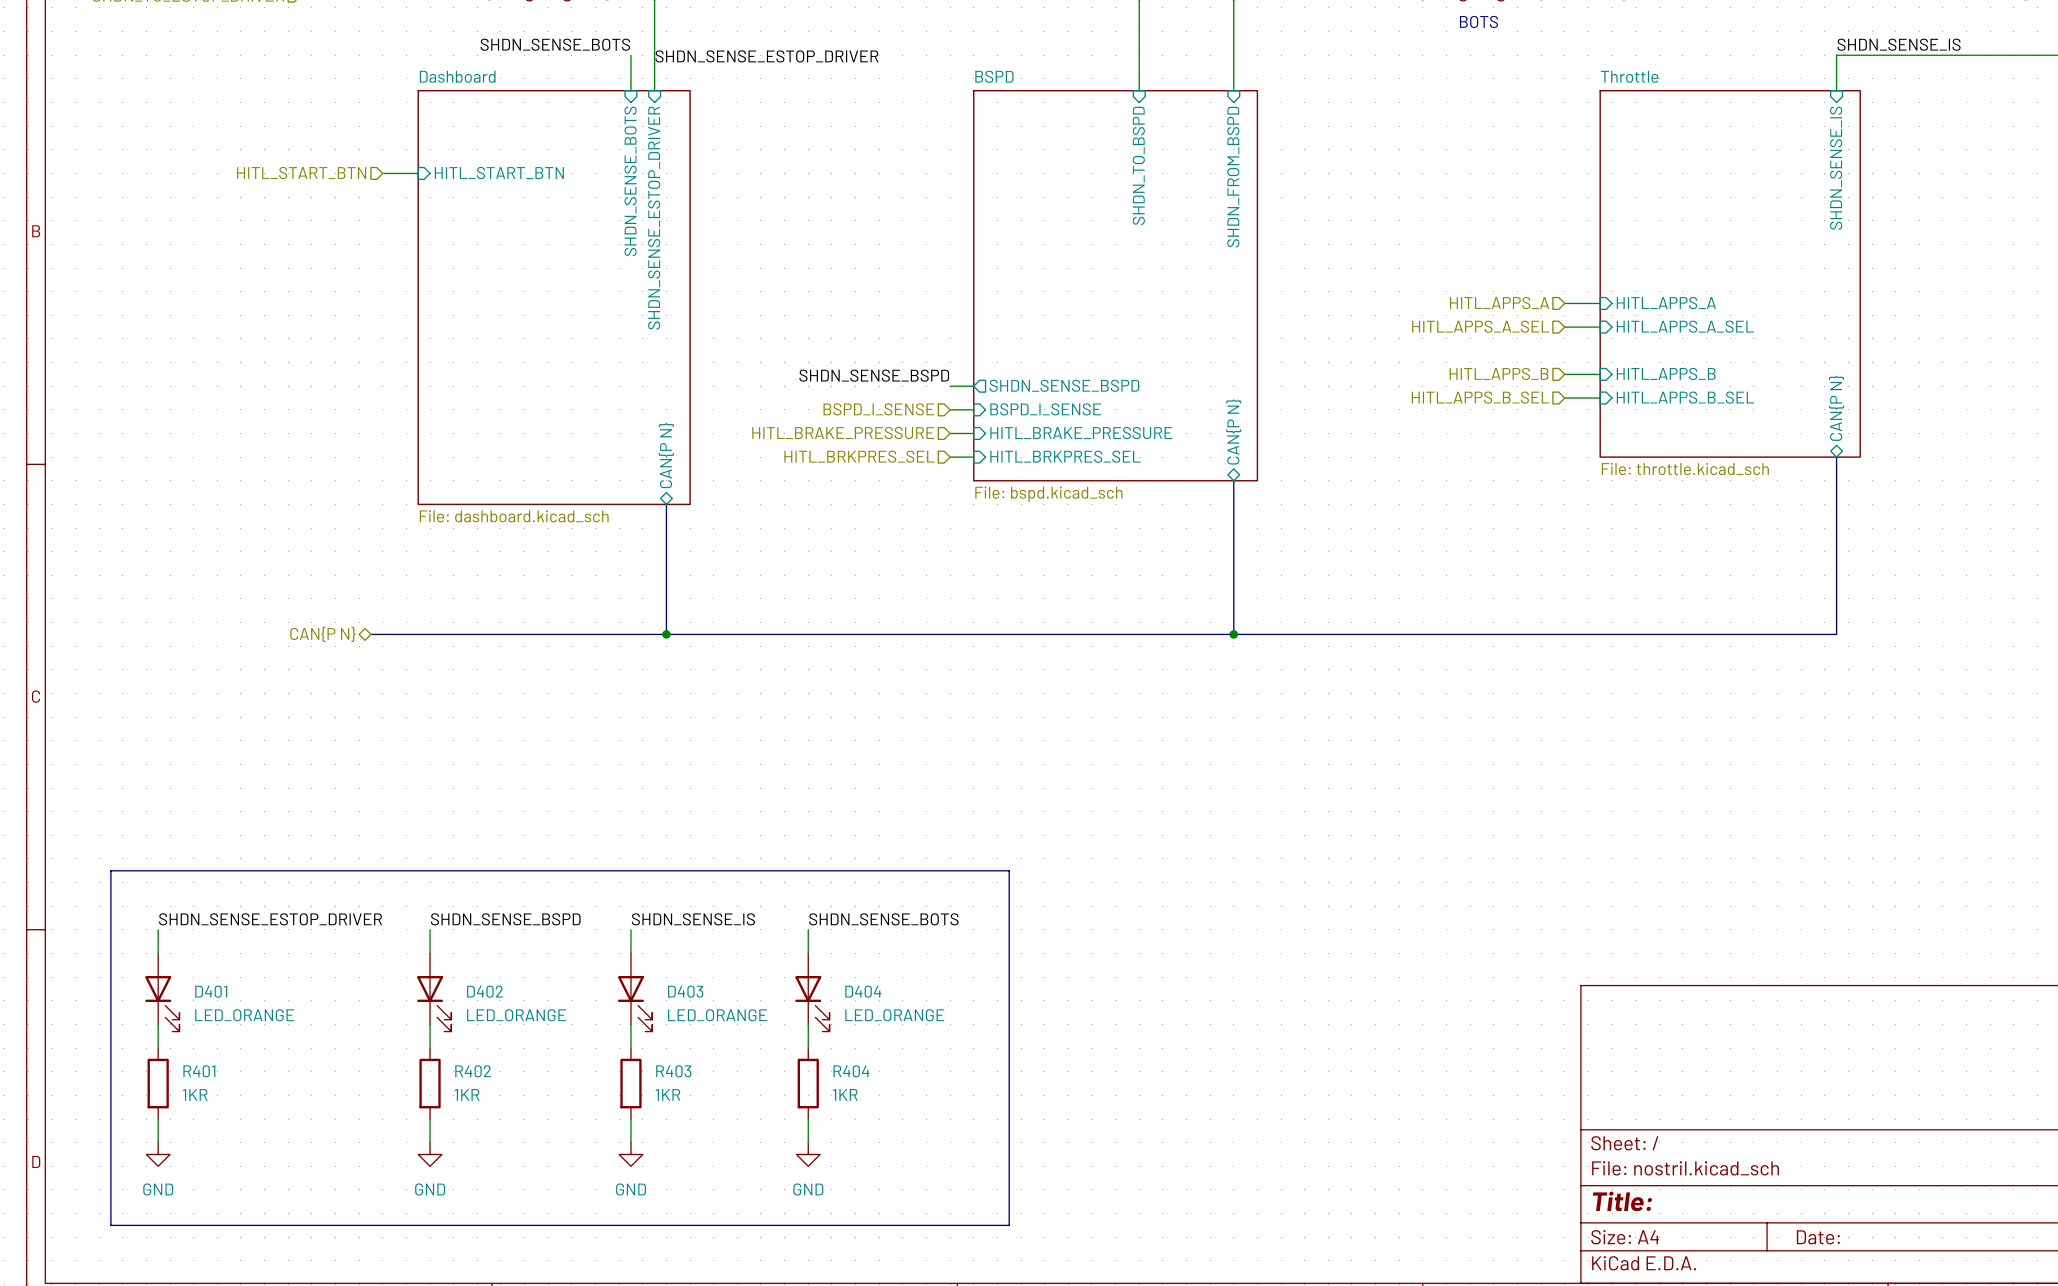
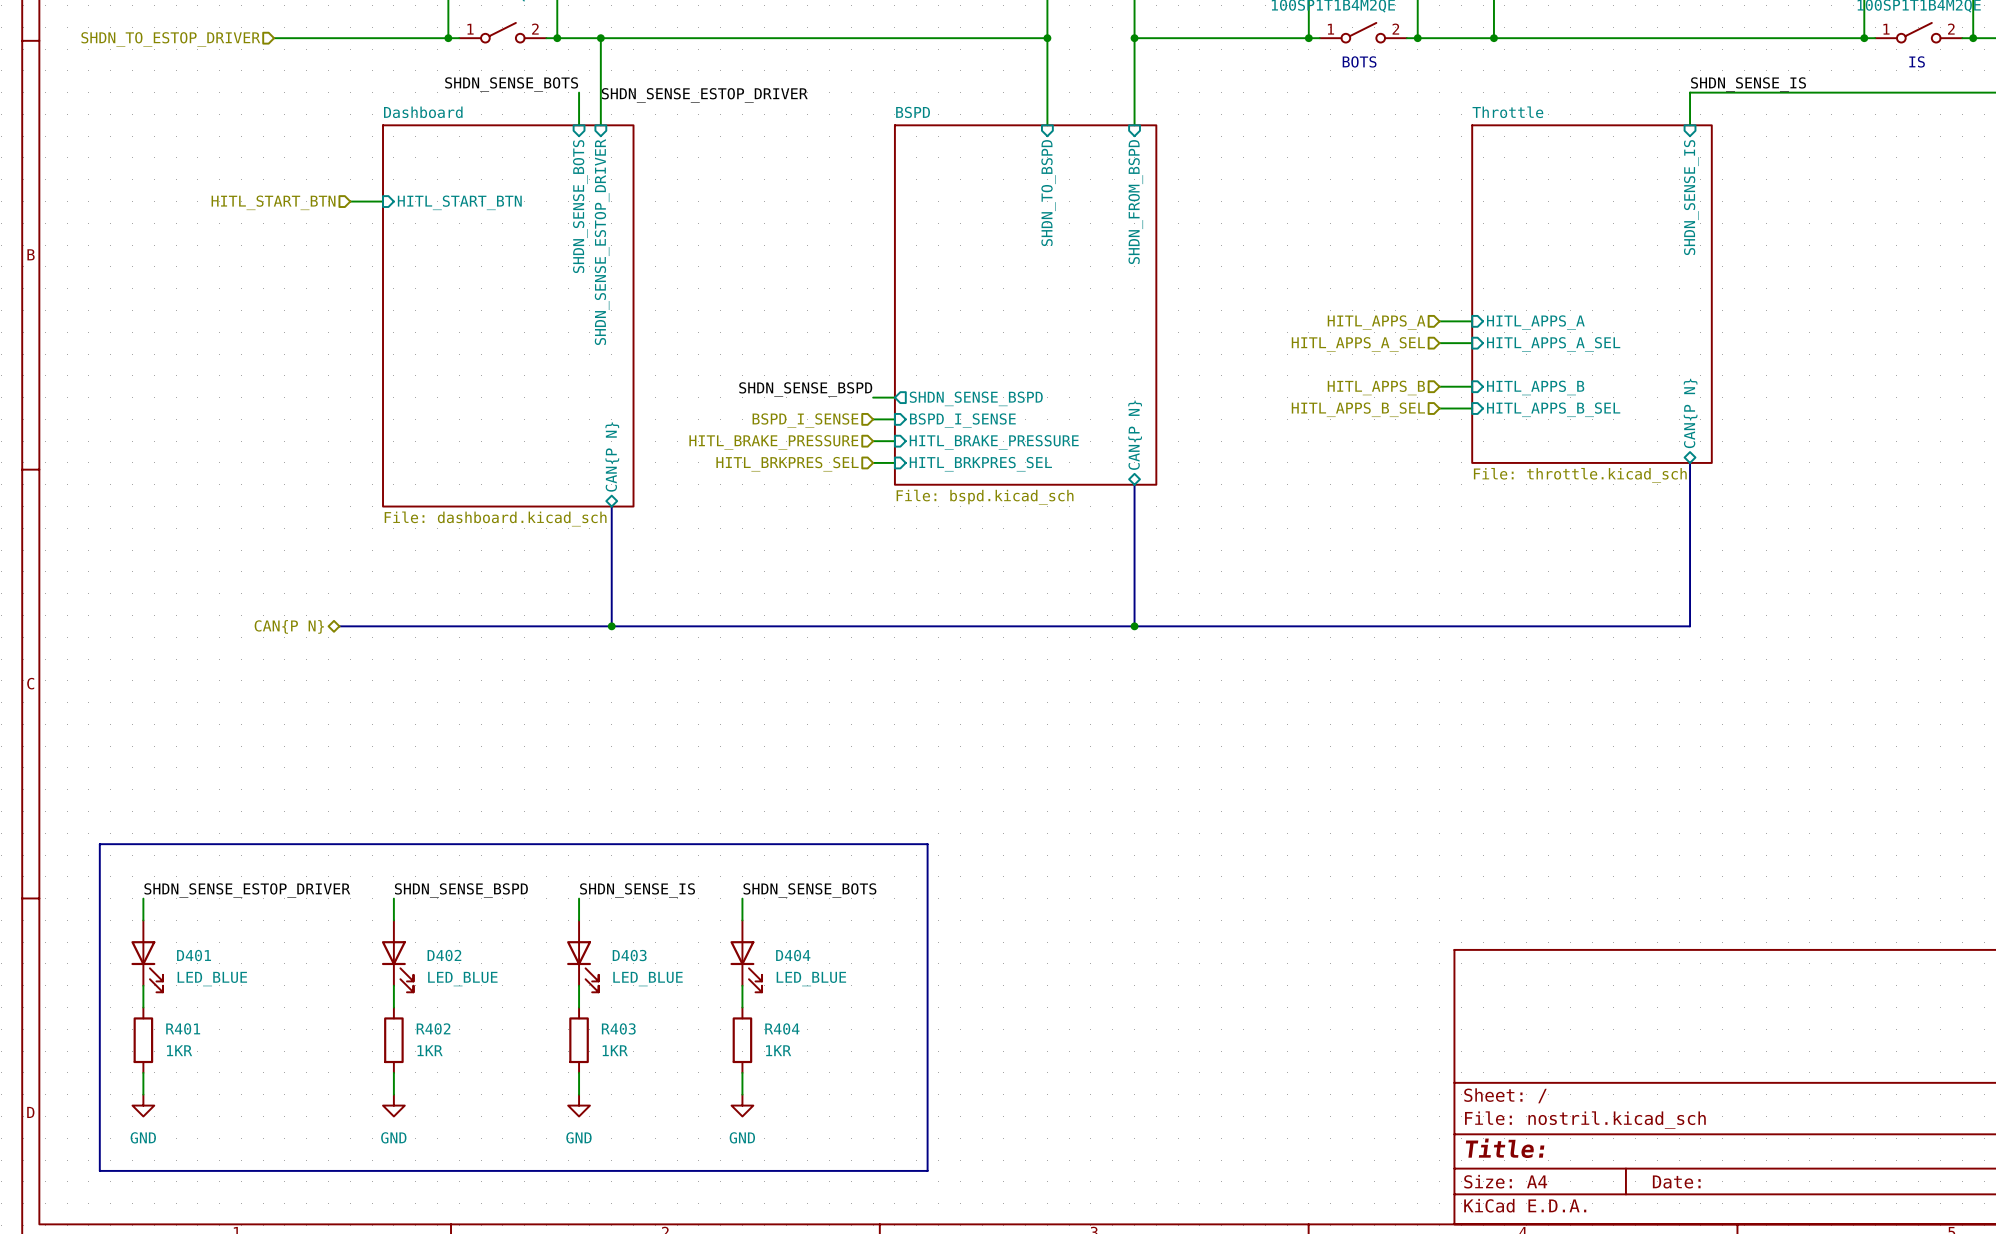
D401 value: LED_ORANGE (244, 1015) -> LED_BLUE (212, 979)
D402 value: LED_ORANGE (516, 1015) -> LED_BLUE (462, 979)
D403 value: LED_ORANGE (717, 1015) -> LED_BLUE (648, 979)
D404 value: LED_ORANGE (894, 1015) -> LED_BLUE (811, 979)

